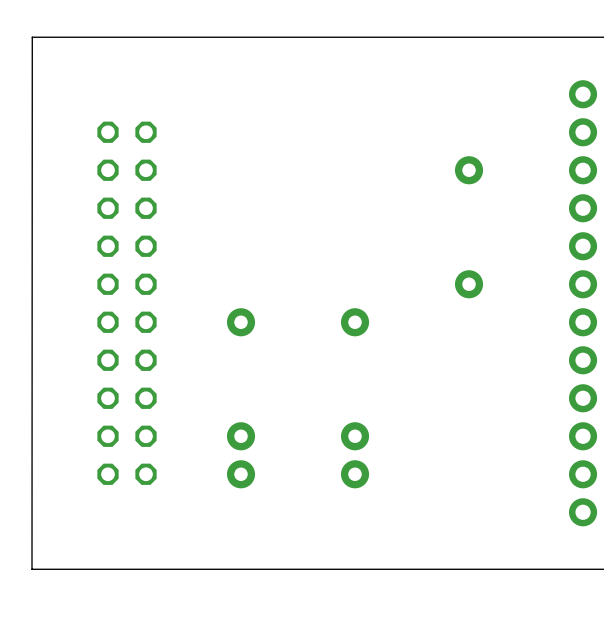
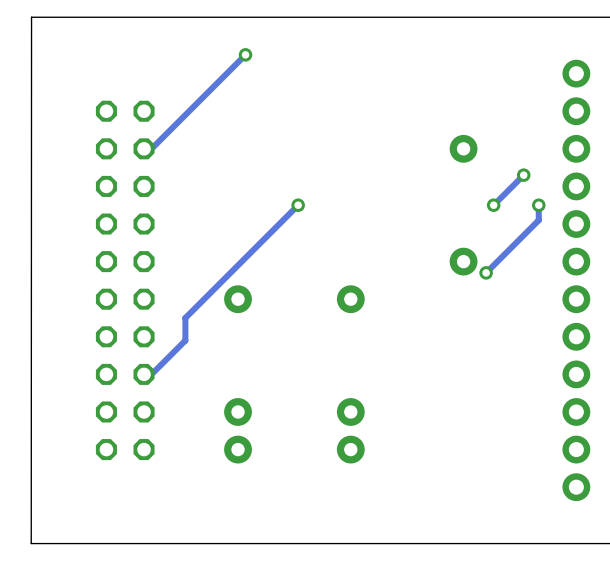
track: none -> (245, 54) (147, 152) (144, 148)
via: none -> (245, 54)
track: none -> (523, 175) (493, 205)
via: none -> (523, 175)
track: none -> (298, 205) (185, 318) (185, 340) (147, 378) (144, 374)
via: none -> (298, 205)
via: none -> (493, 205)
track: none -> (538, 205) (538, 220) (486, 272)
via: none -> (538, 205)
via: none -> (486, 272)

